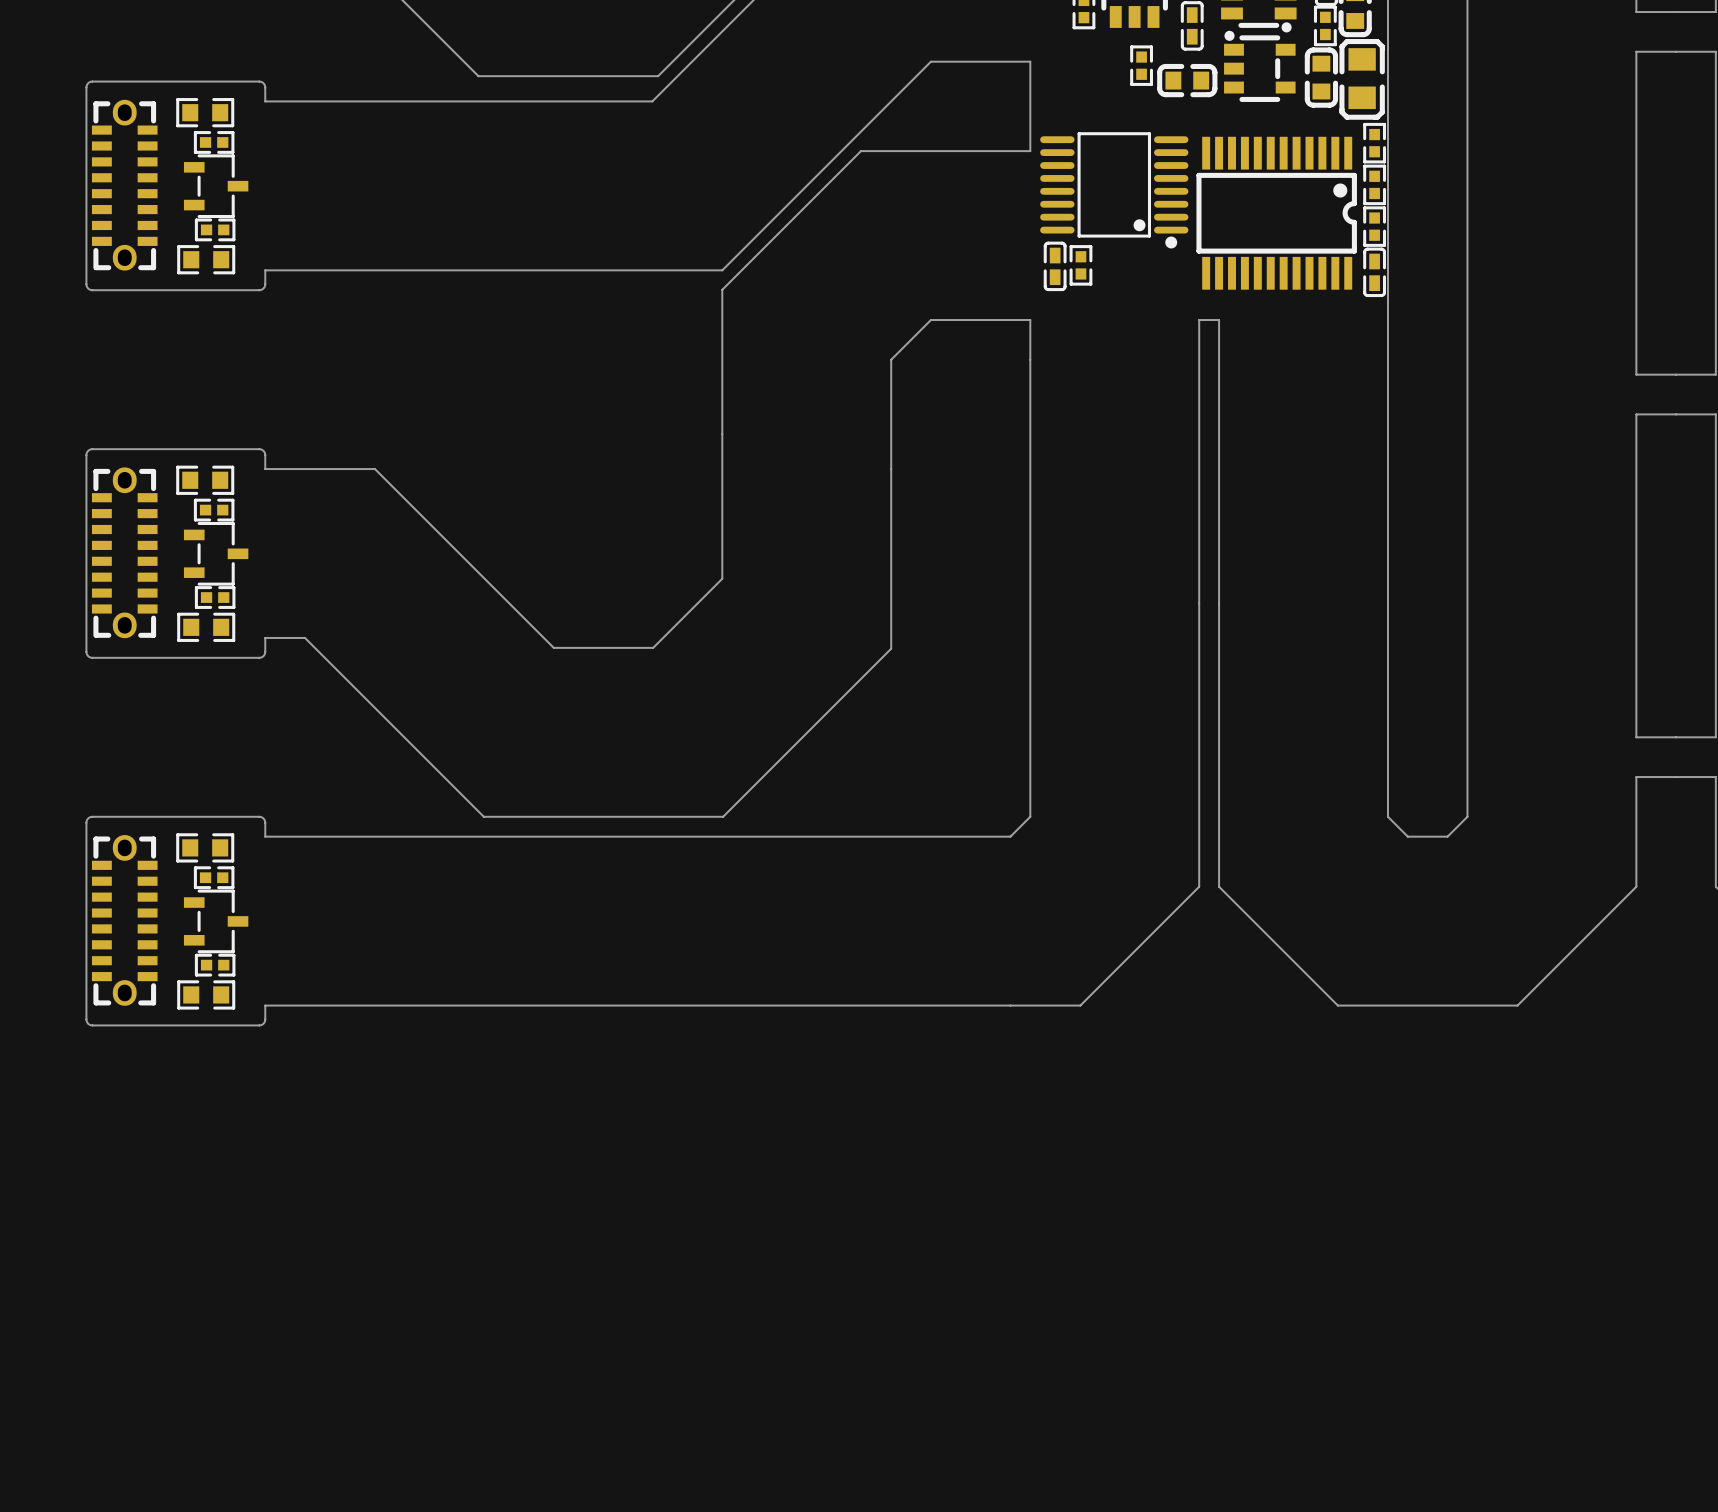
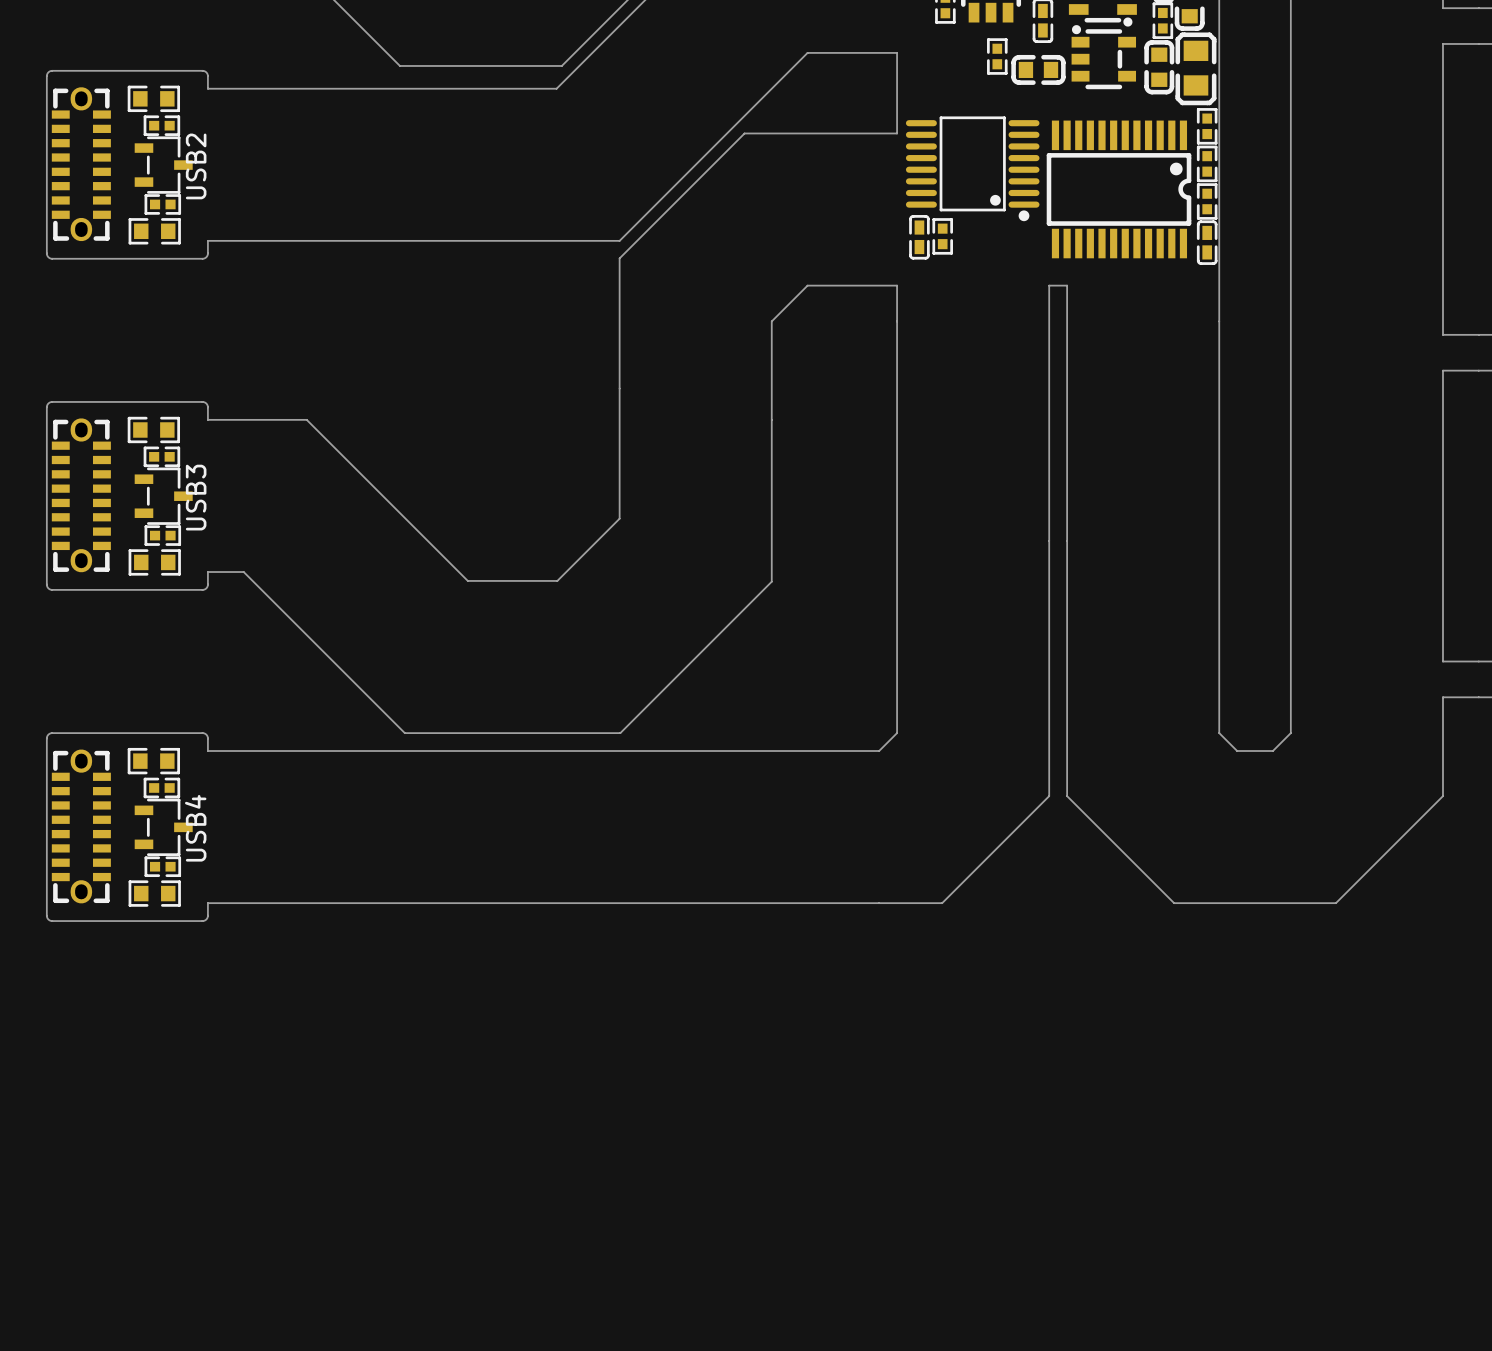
USB2 name: none -> USB2 (196, 166)
USB3 name: none -> USB3 (196, 497)
USB4 name: none -> USB4 (195, 828)

